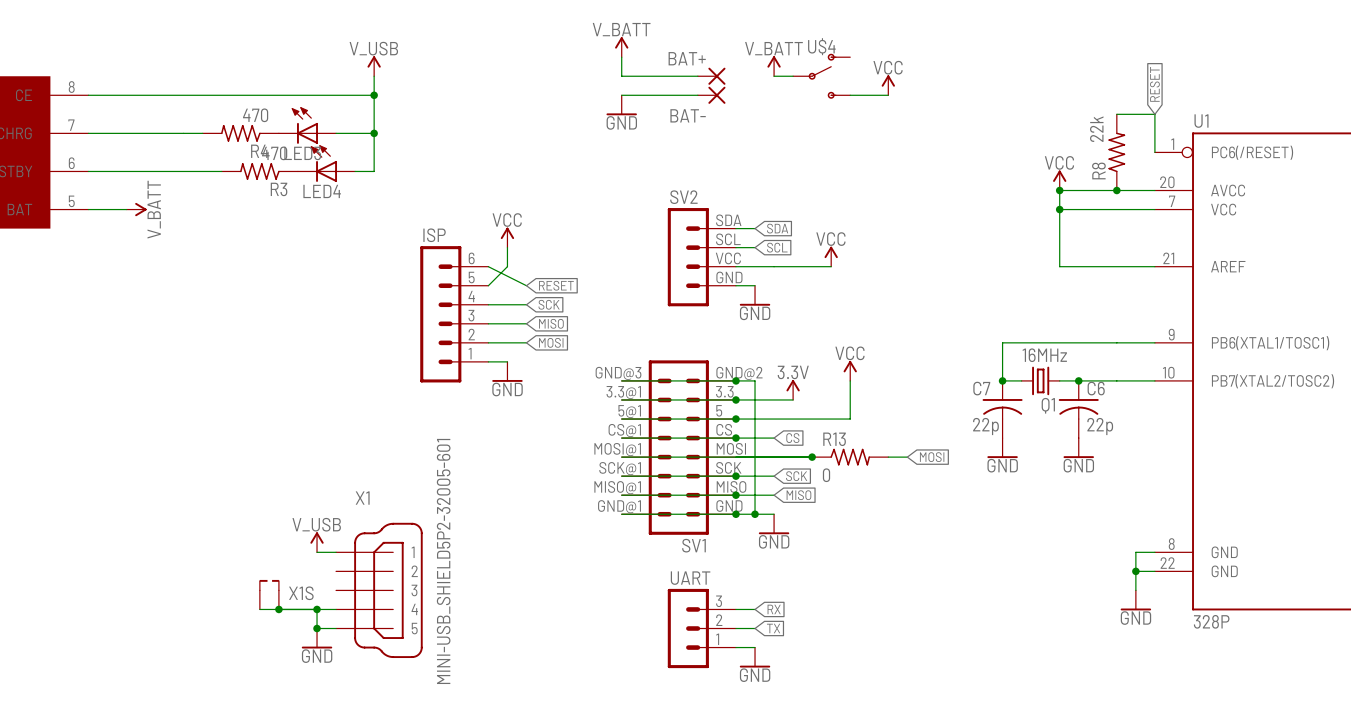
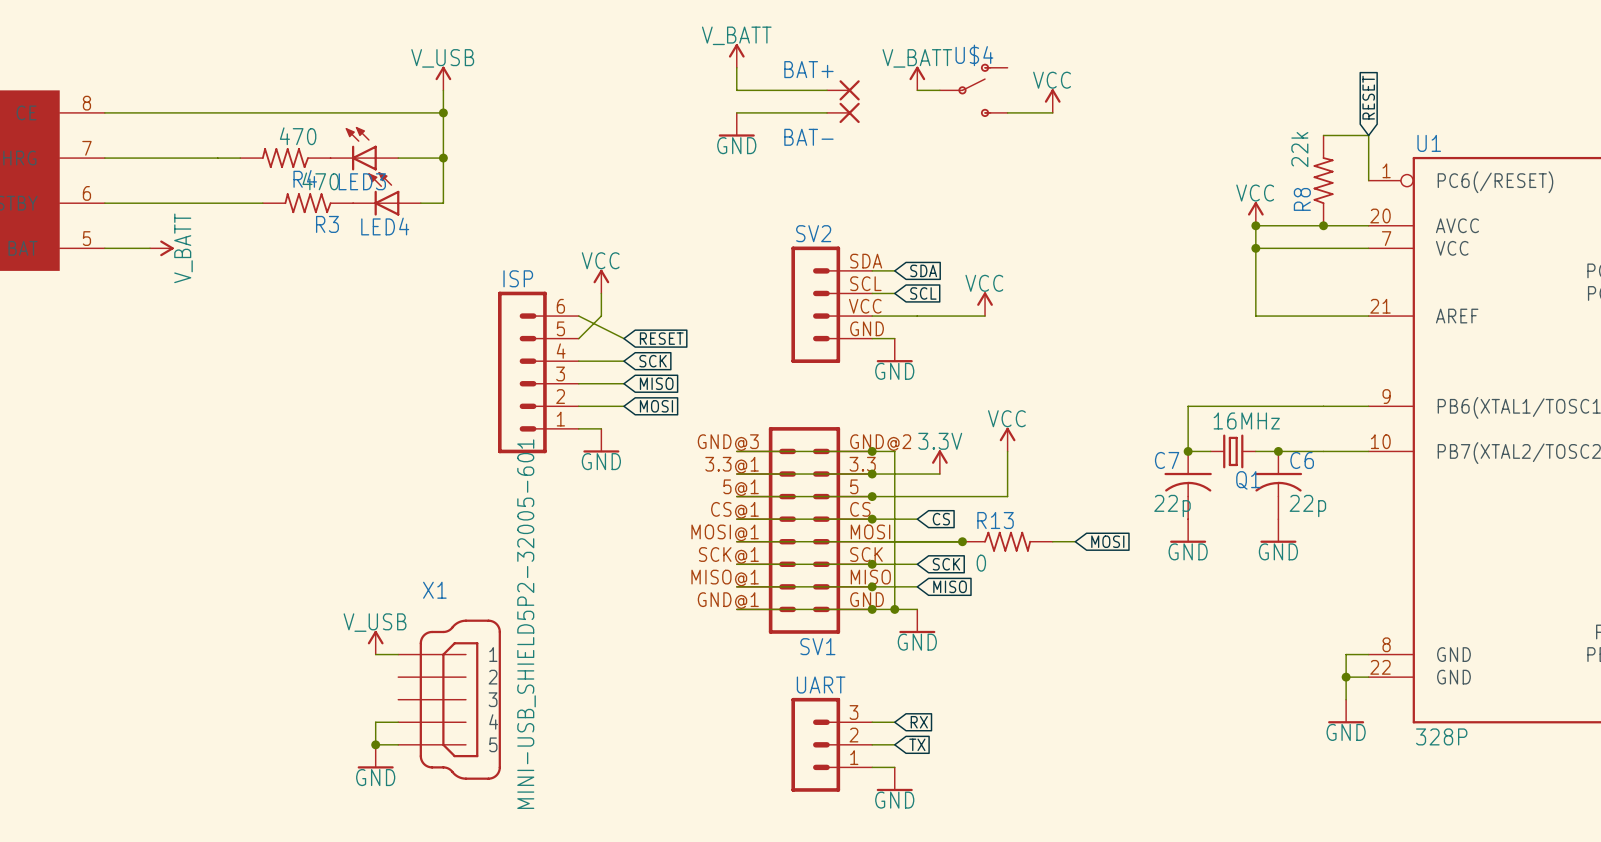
X1S: (269, 594) -> none
wire: (259, 609) (317, 609) -> none
junction: (278, 609) -> none
junction: (317, 609) -> none

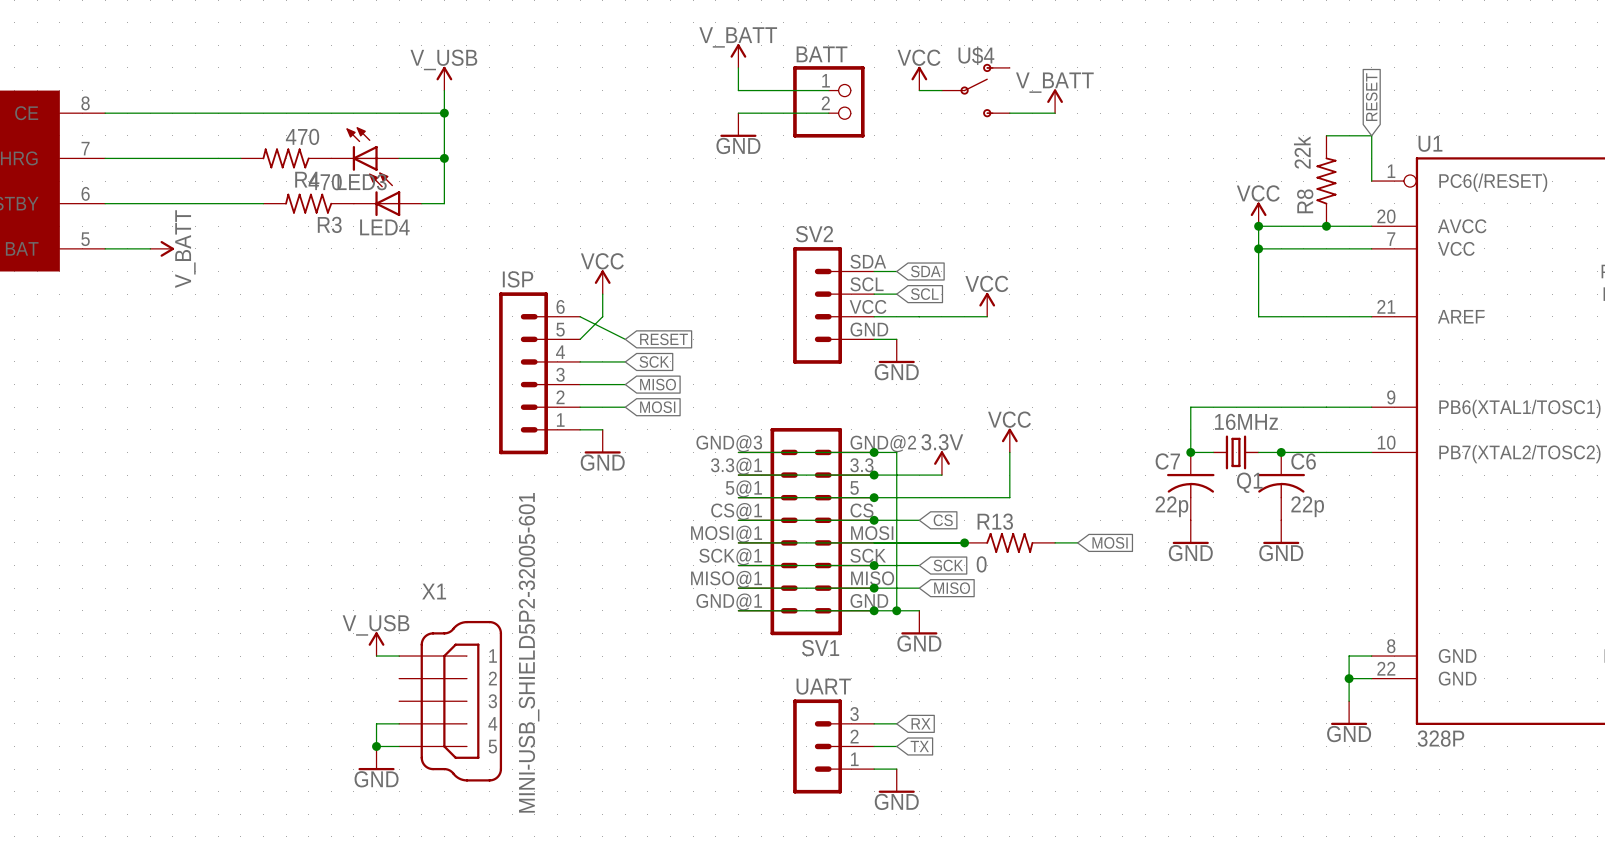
power symbol: V_BATT (917, 78) -> VCC (919, 78)
BAT+: (843, 90) -> none
BATT: none -> (828, 101)
power symbol: VCC (1052, 101) -> V_BATT (1055, 101)
BAT-: (843, 112) -> none

